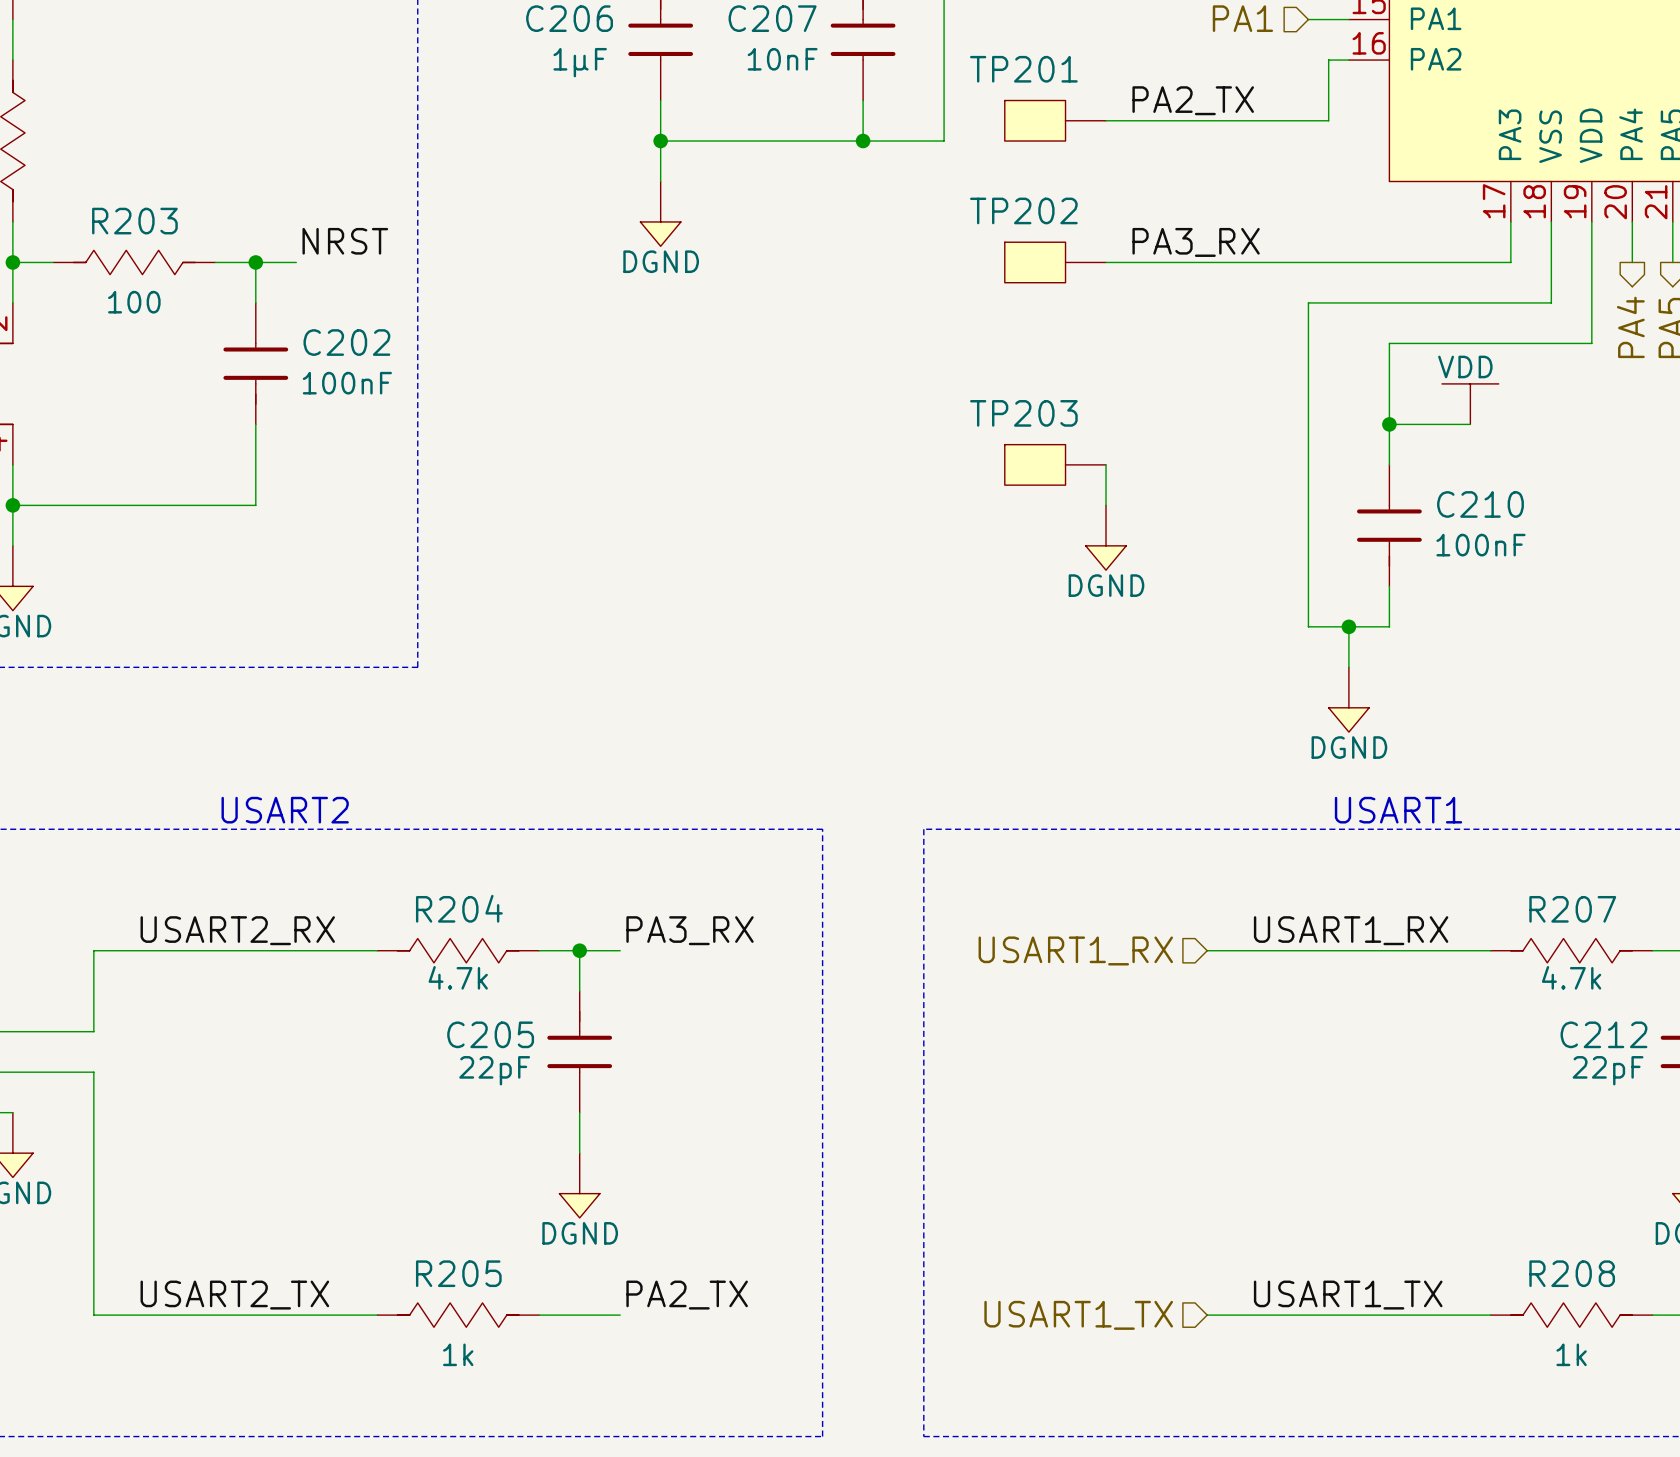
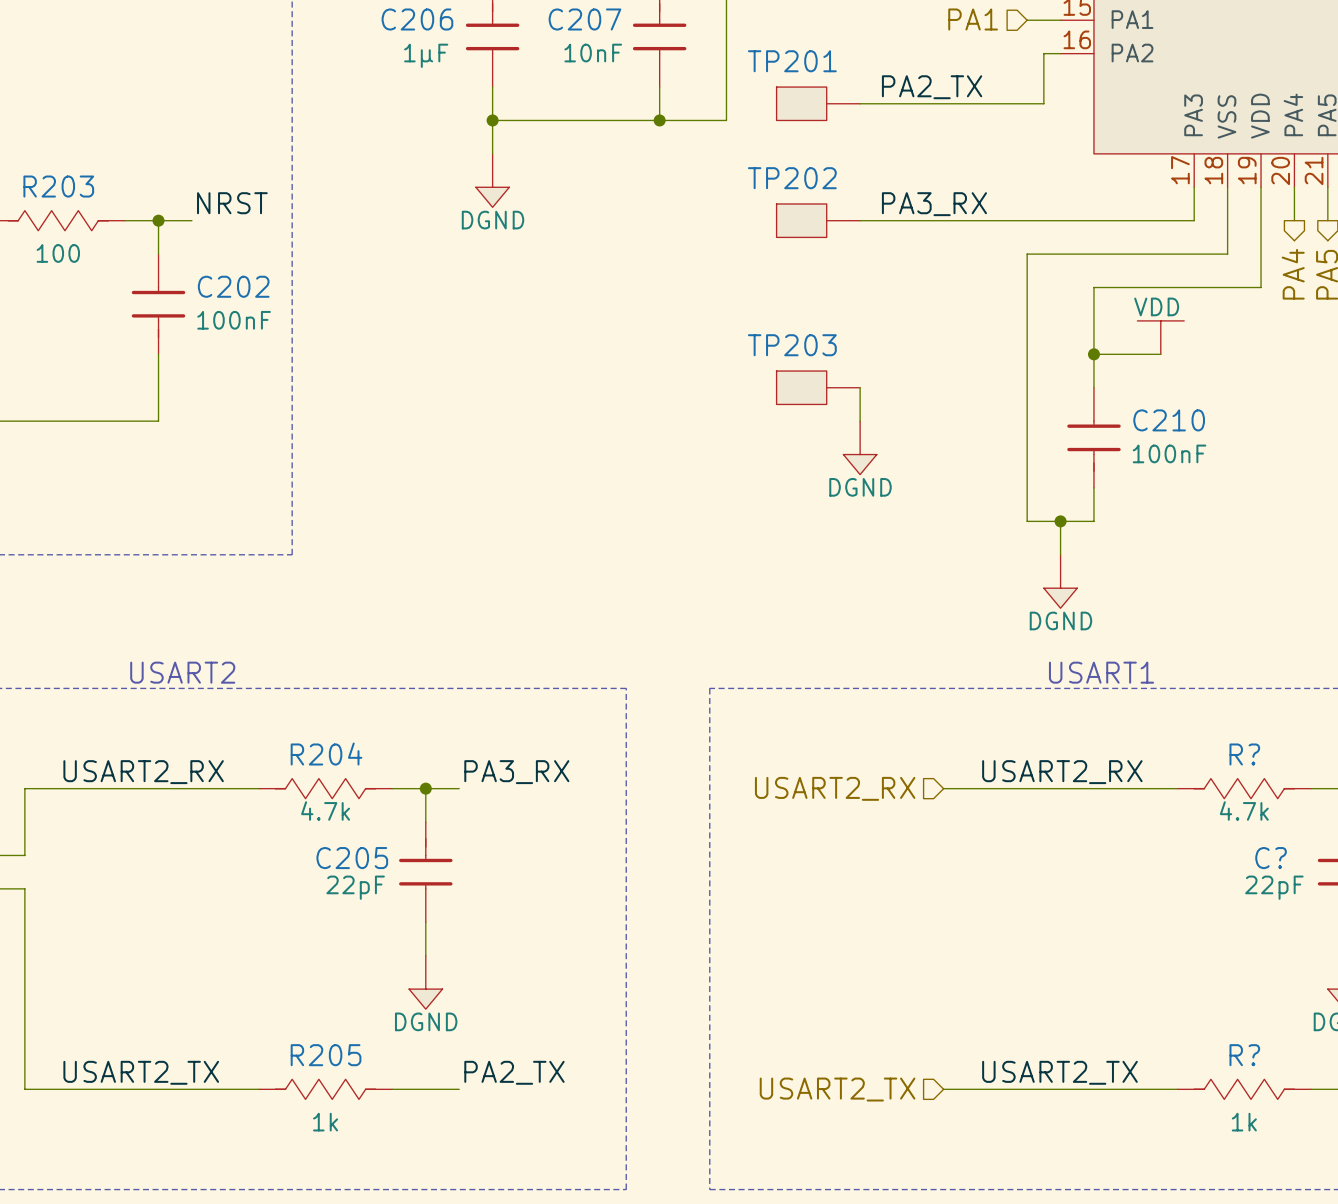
R207 name: R207 (1572, 909) -> R? (1244, 754)
label: USART1_RX (1351, 930) -> USART2_RX (1062, 772)
hierarchical label: USART1_RX (1075, 950) -> USART2_RX (835, 788)
C212 name: C212 (1603, 1034) -> C? (1271, 858)
R208 name: R208 (1572, 1273) -> R? (1244, 1055)
label: USART1_TX (1348, 1295) -> USART2_TX (1059, 1072)
hierarchical label: USART1_TX (1078, 1315) -> USART2_TX (837, 1089)

